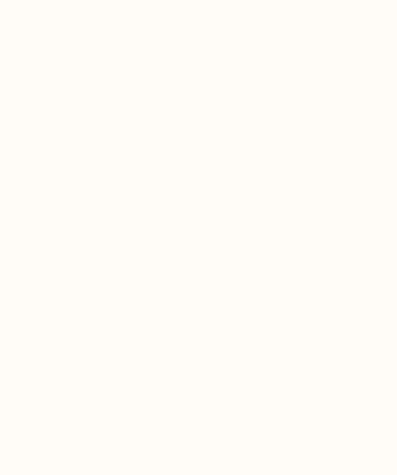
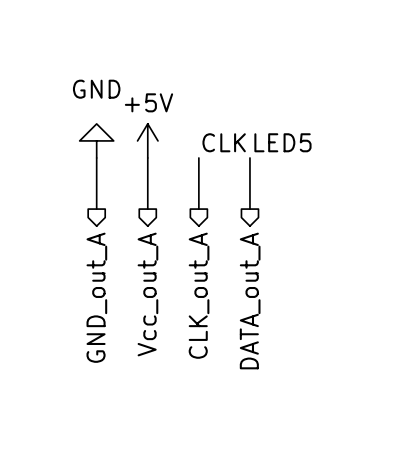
power symbol: none -> GND (96, 140)
power symbol: none -> +5V (147, 140)
label: none -> CLK (224, 142)
label: none -> LED5 (282, 142)
wire: none -> (96, 157) (96, 209)
wire: none -> (147, 157) (147, 209)
wire: none -> (198, 157) (198, 209)
wire: none -> (249, 157) (249, 209)
hierarchical label: none -> Vcc_out_A (147, 294)
hierarchical label: none -> CLK_out_A (199, 295)
hierarchical label: none -> GND_out_A (96, 297)
hierarchical label: none -> DATA_out_A (250, 300)

